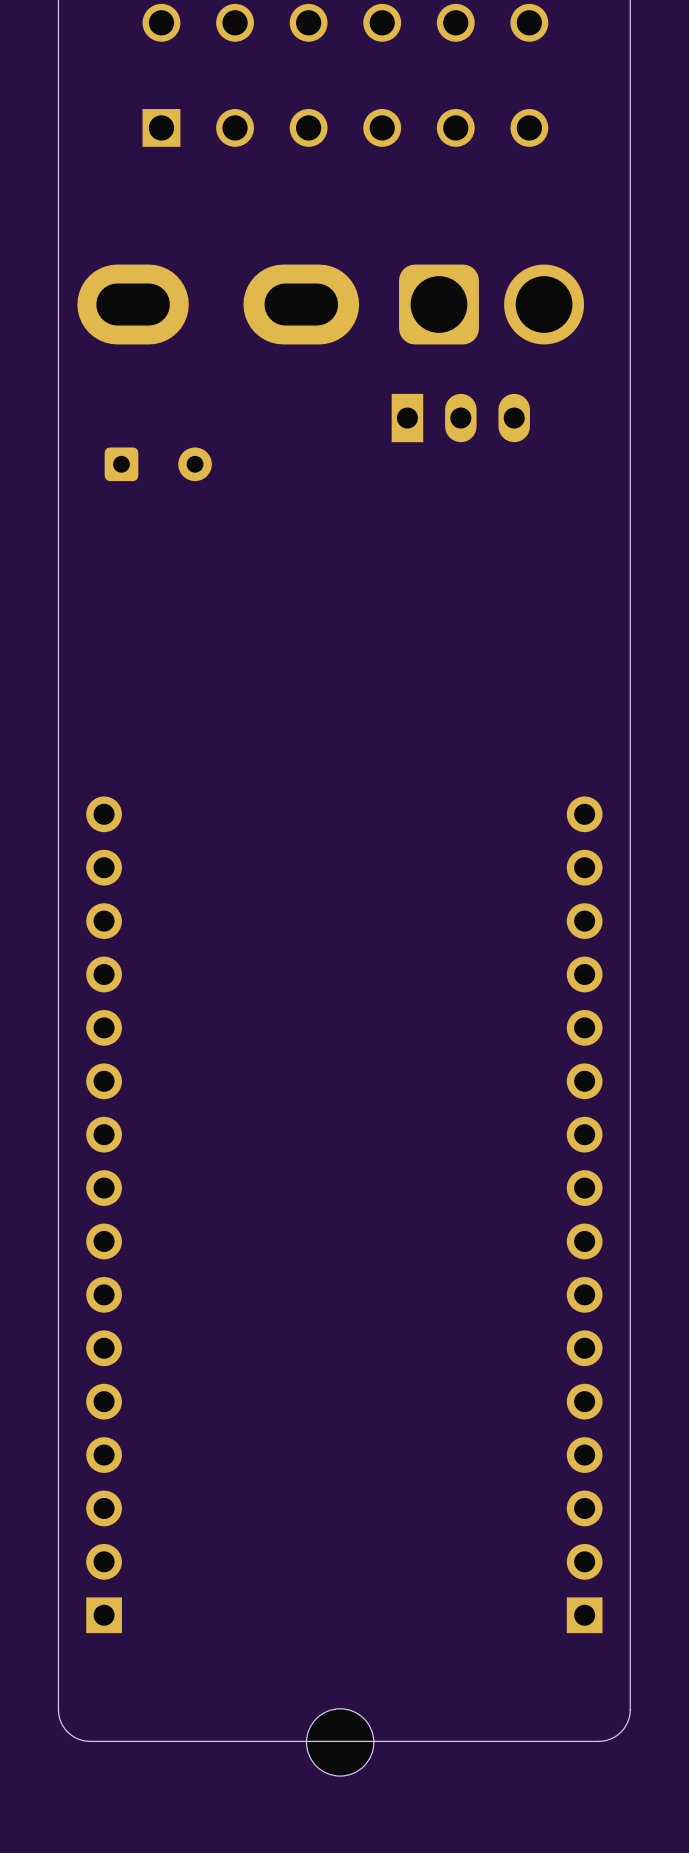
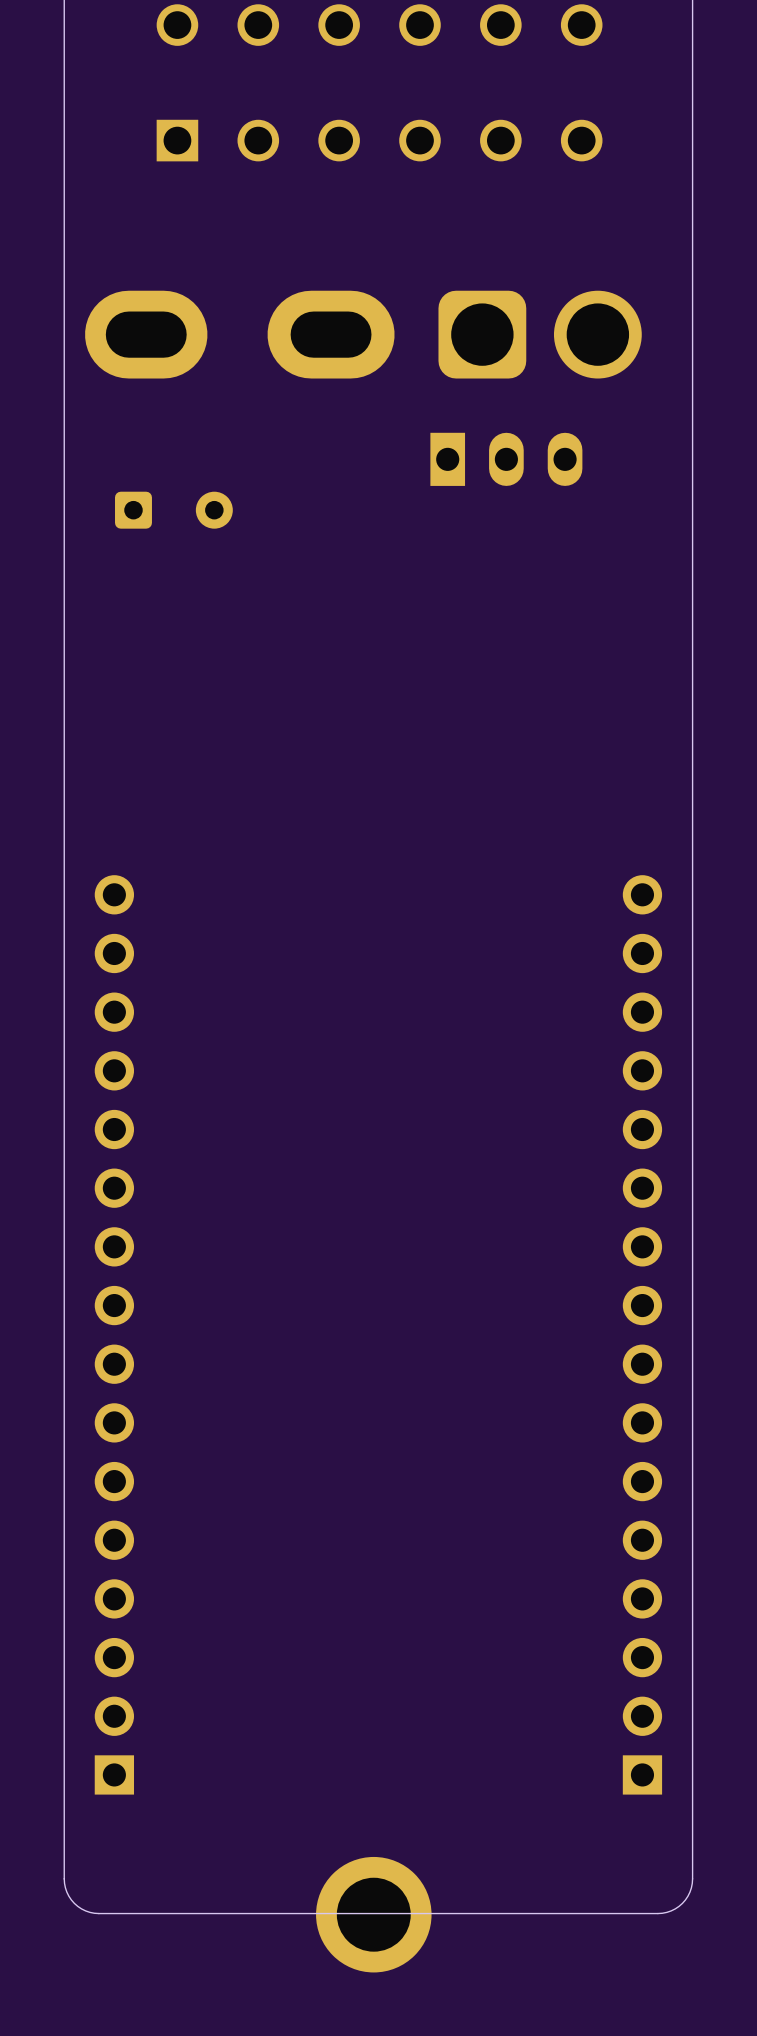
part footprint: [306, 1708, 374, 1777] -> [316, 1856, 432, 1973]

